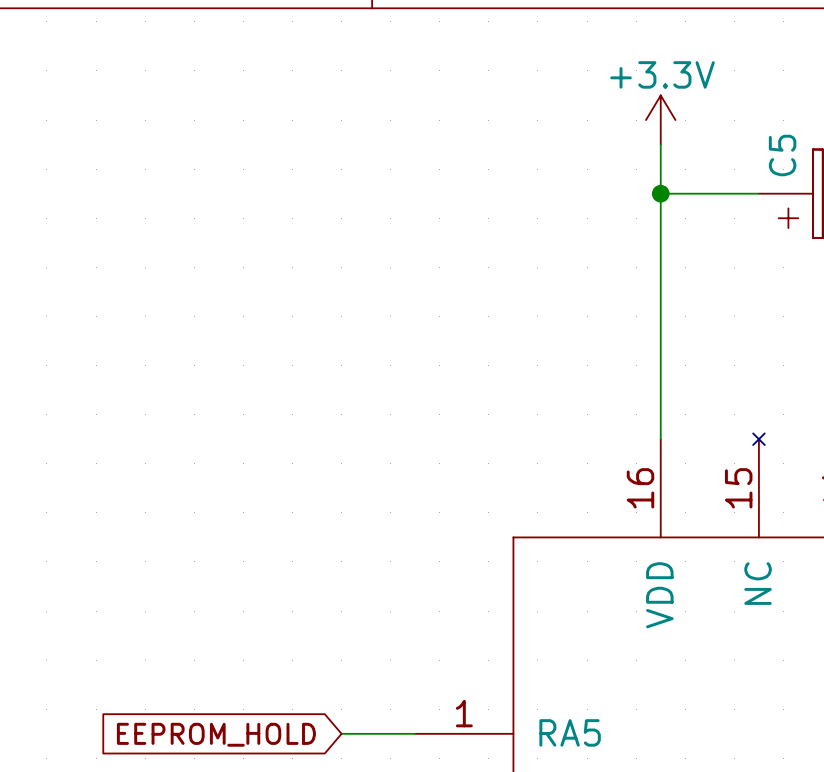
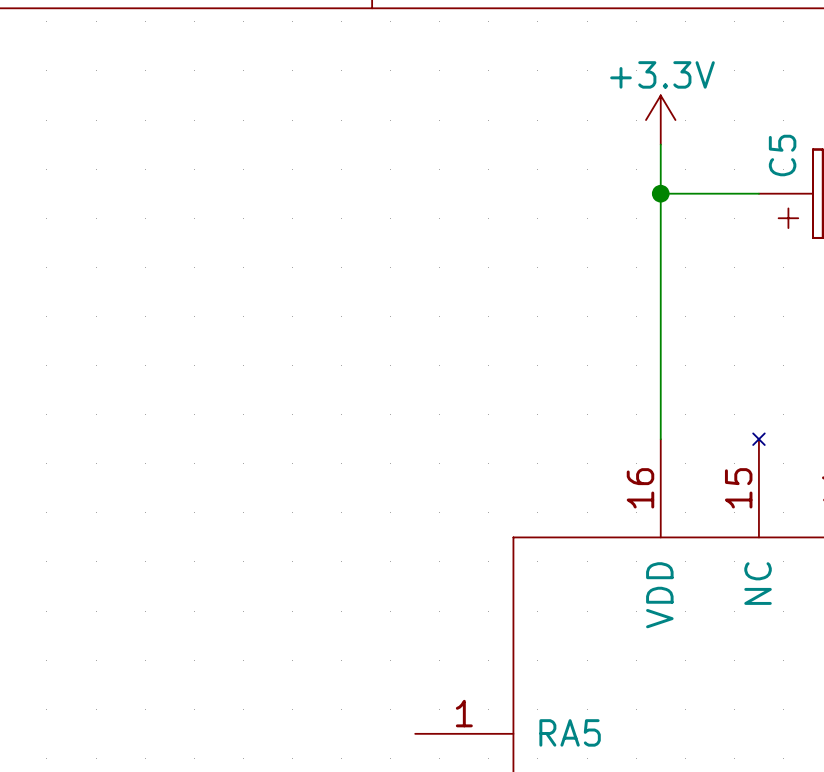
wire: (341, 733) (415, 733) -> none
global label: EEPROM_HOLD (216, 734) -> none

